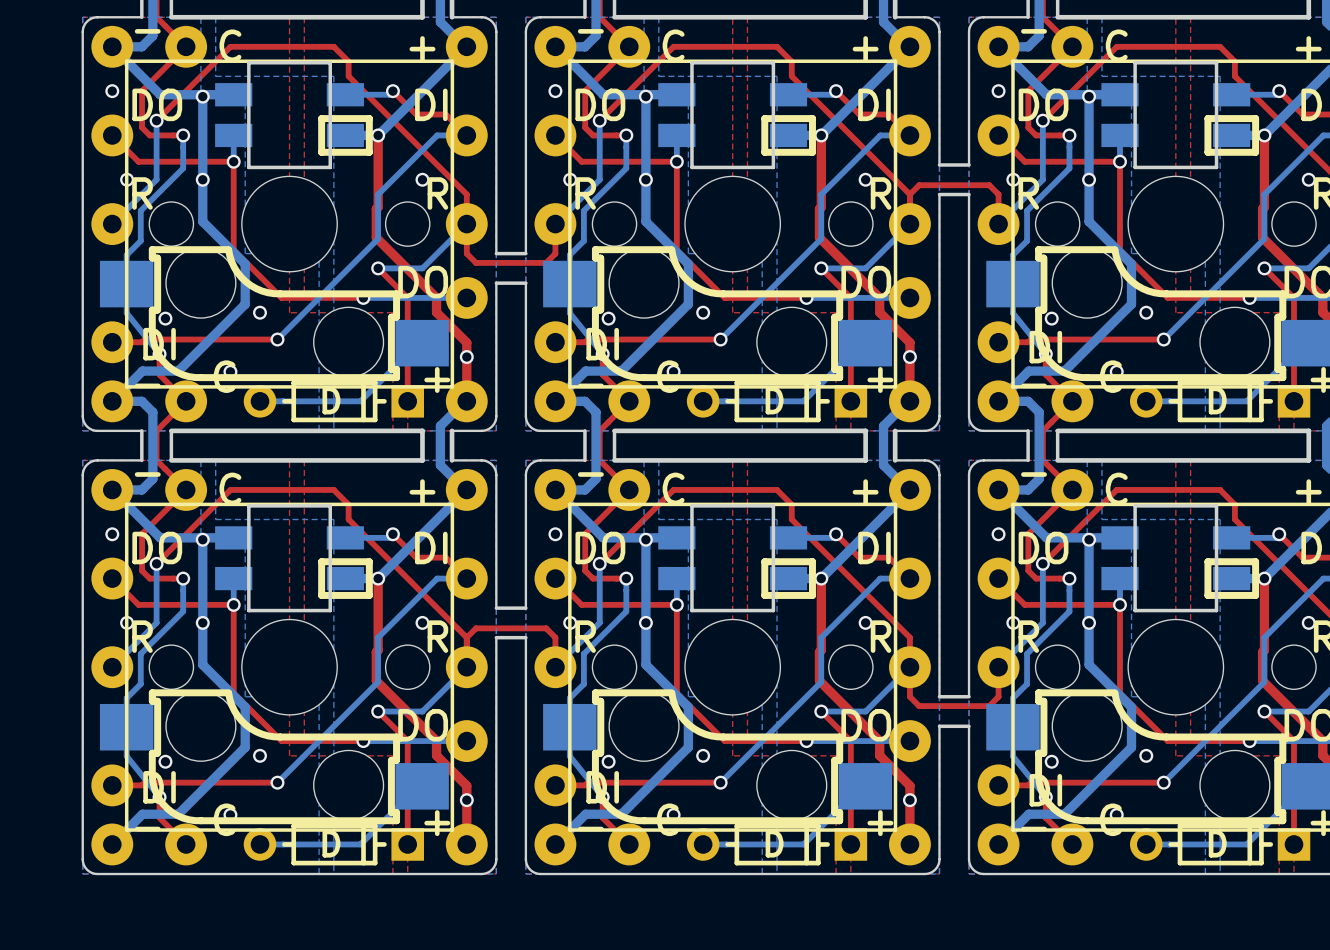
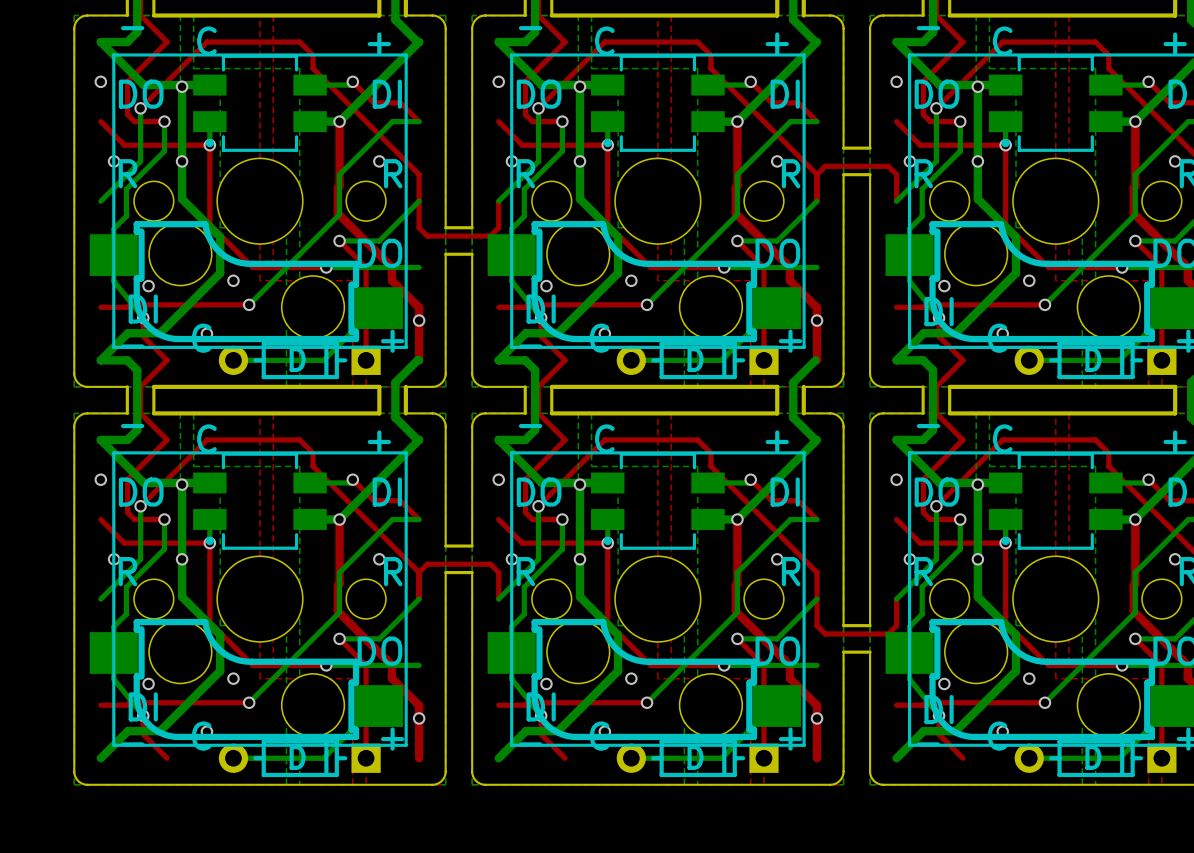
part: (112, 46) -> none
part: (186, 46) -> none
part: (466, 46) -> none
part: (555, 46) -> none
part: (629, 46) -> none
part: (909, 46) -> none
part: (998, 46) -> none
part: (1072, 46) -> none
part side: top (293, 115) -> bottom (259, 103)
part side: top (737, 115) -> bottom (657, 103)
part side: top (1180, 115) -> bottom (1055, 103)
part: (112, 135) -> none
part: (466, 135) -> none
part: (555, 135) -> none
part: (909, 135) -> none
part: (998, 135) -> none
part: (112, 224) -> none
part: (466, 224) -> none
part: (555, 224) -> none
part: (909, 224) -> none
part: (998, 224) -> none
part: (466, 297) -> none
part: (909, 297) -> none
part: (112, 342) -> none
part: (555, 342) -> none
part: (998, 342) -> none
part: (112, 401) -> none
part: (186, 401) -> none
part: (466, 401) -> none
part: (555, 401) -> none
part: (629, 401) -> none
part: (909, 401) -> none
part: (998, 401) -> none
part: (1072, 401) -> none
part: (112, 489) -> none
part: (186, 489) -> none
part: (466, 489) -> none
part: (555, 489) -> none
part: (629, 489) -> none
part: (909, 489) -> none
part: (998, 489) -> none
part: (1072, 489) -> none
part side: top (293, 558) -> bottom (259, 501)
part side: top (737, 558) -> bottom (657, 501)
part side: top (1180, 558) -> bottom (1055, 501)
part: (112, 578) -> none
part: (466, 578) -> none
part: (555, 578) -> none
part: (909, 578) -> none
part: (998, 578) -> none
part: (112, 667) -> none
part: (466, 667) -> none
part: (555, 667) -> none
part: (909, 667) -> none
part: (998, 667) -> none
part: (466, 741) -> none
part: (909, 741) -> none
part: (112, 785) -> none
part: (555, 785) -> none
part: (998, 785) -> none
part: (112, 844) -> none
part: (186, 844) -> none
part: (466, 844) -> none
part: (555, 844) -> none
part: (629, 844) -> none
part: (909, 844) -> none
part: (998, 844) -> none
part: (1072, 844) -> none

